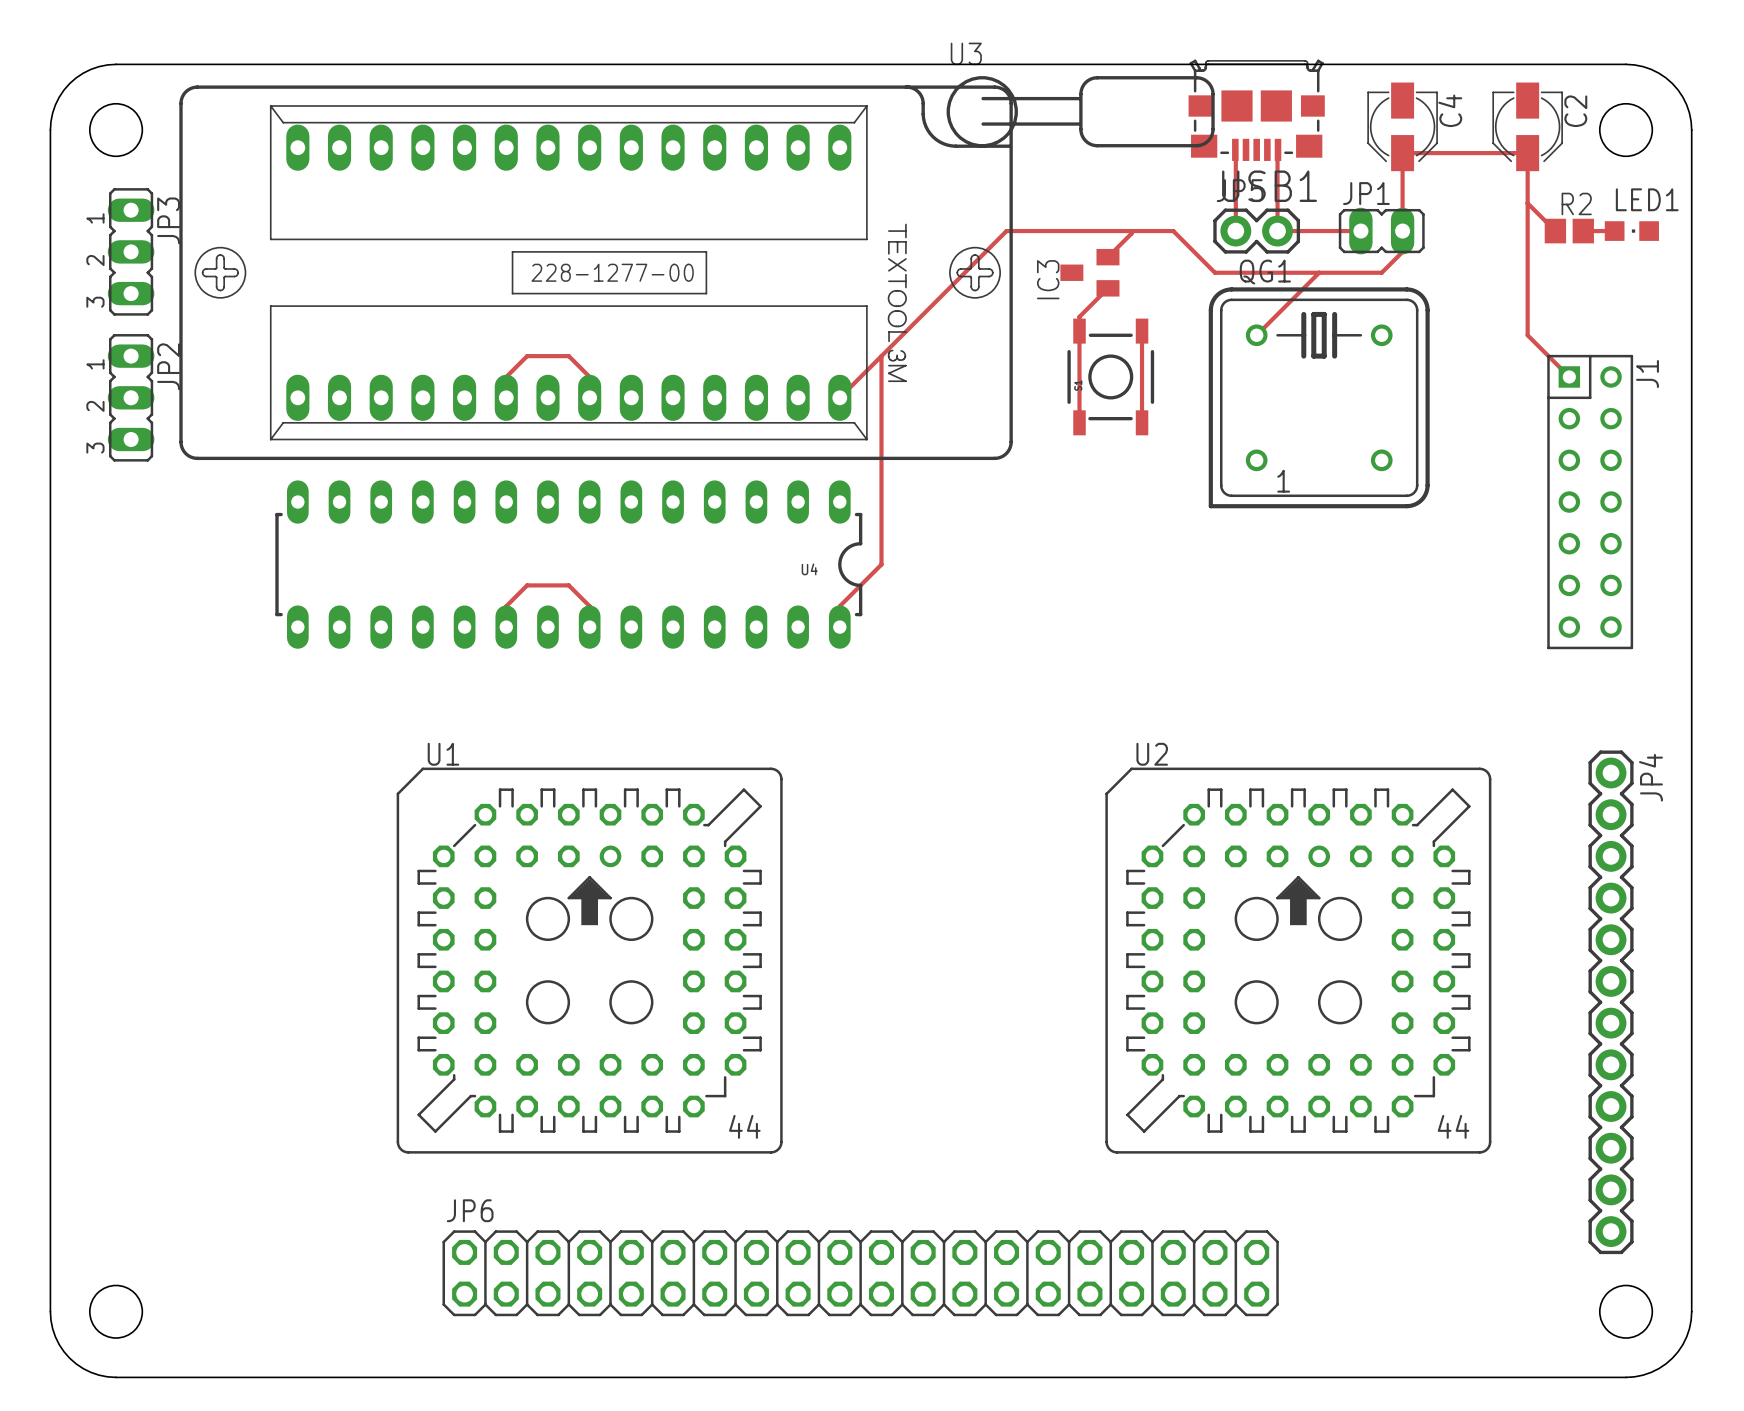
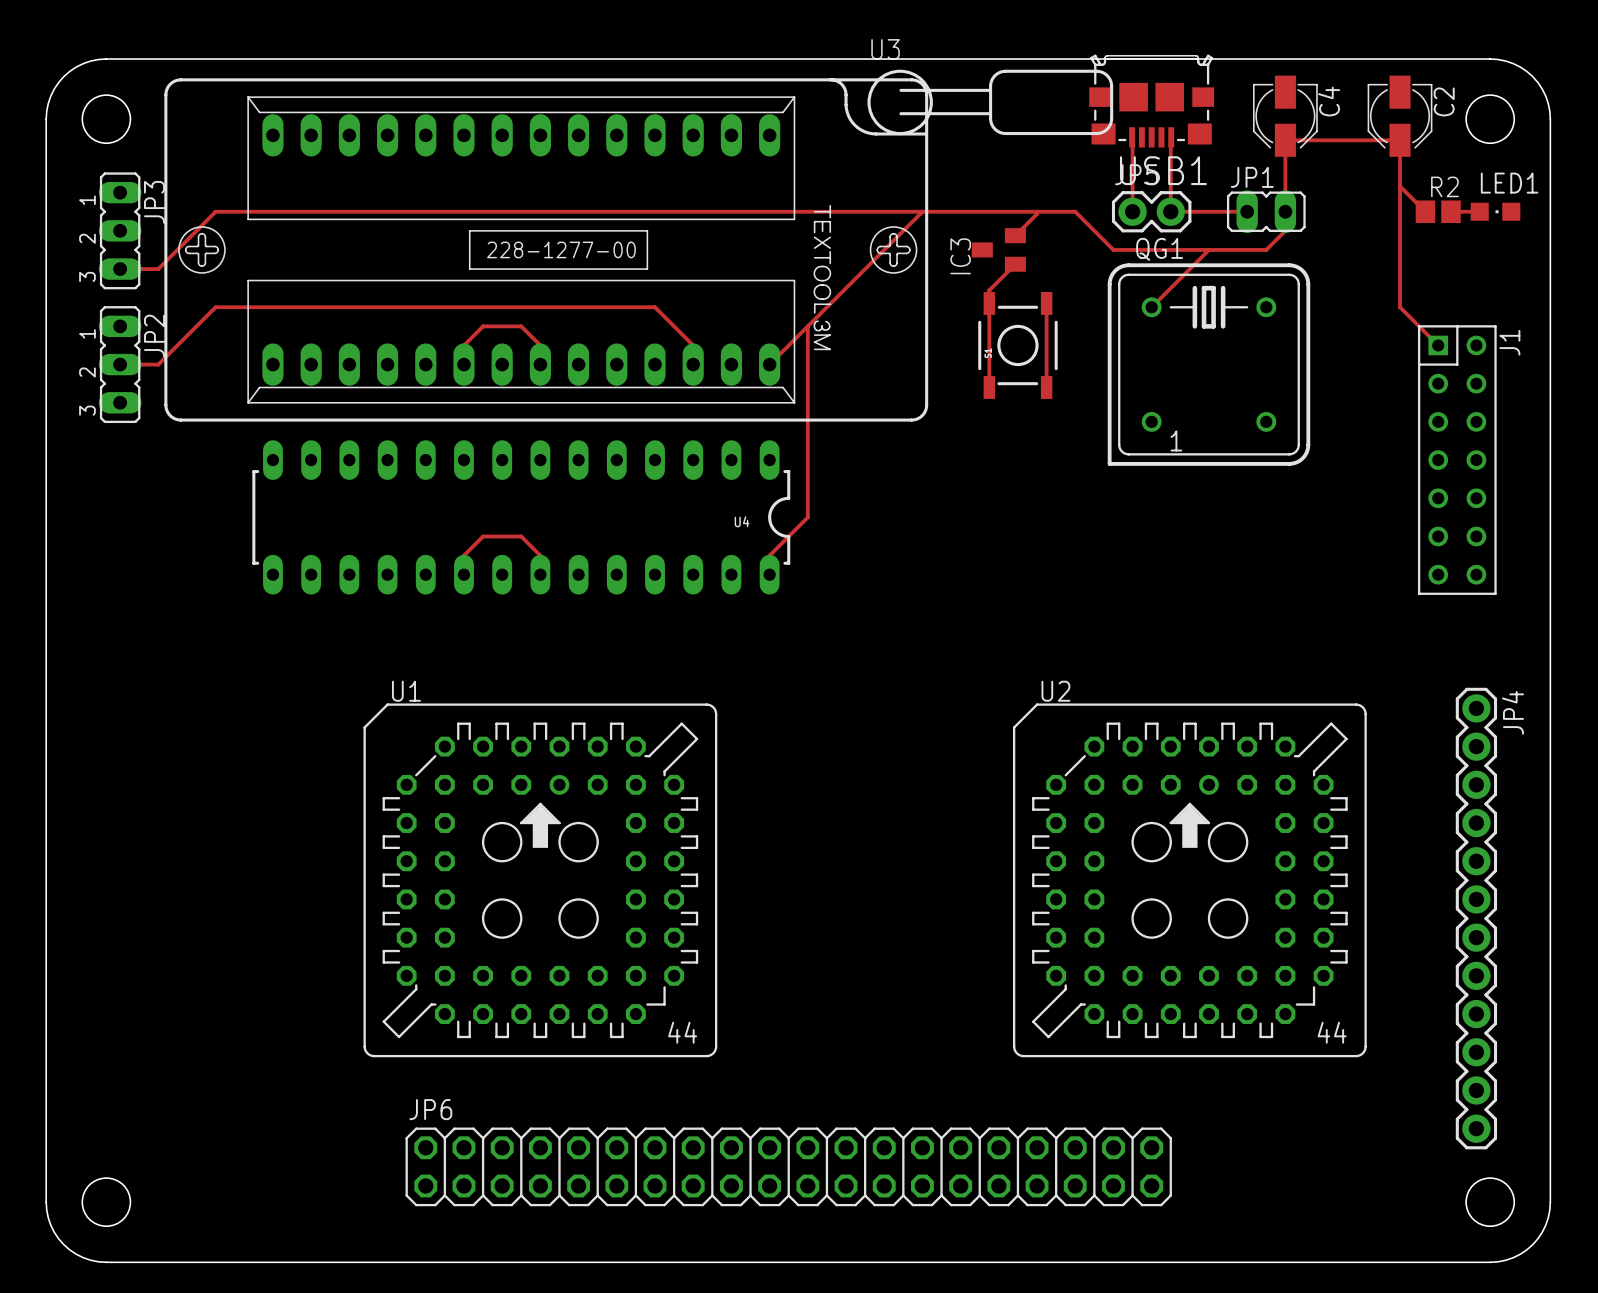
track: none -> (922, 211) (215, 211) (158, 269) (120, 269)
track: none -> (120, 364) (158, 364) (215, 307) (655, 307) (693, 345) (693, 364)

